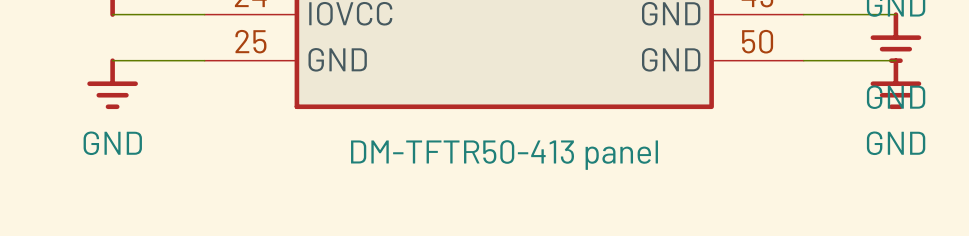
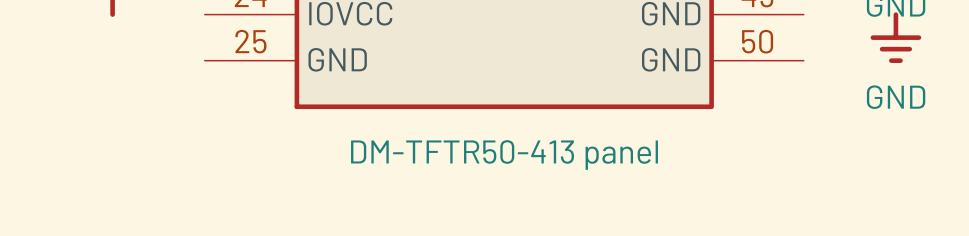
wire: (112, 14) (204, 14) -> none
wire: (803, 14) (895, 14) -> none
wire: (112, 60) (204, 60) -> none
wire: (803, 60) (895, 60) -> none
power symbol: GND (112, 83) -> none
power symbol: GND (895, 83) -> none

